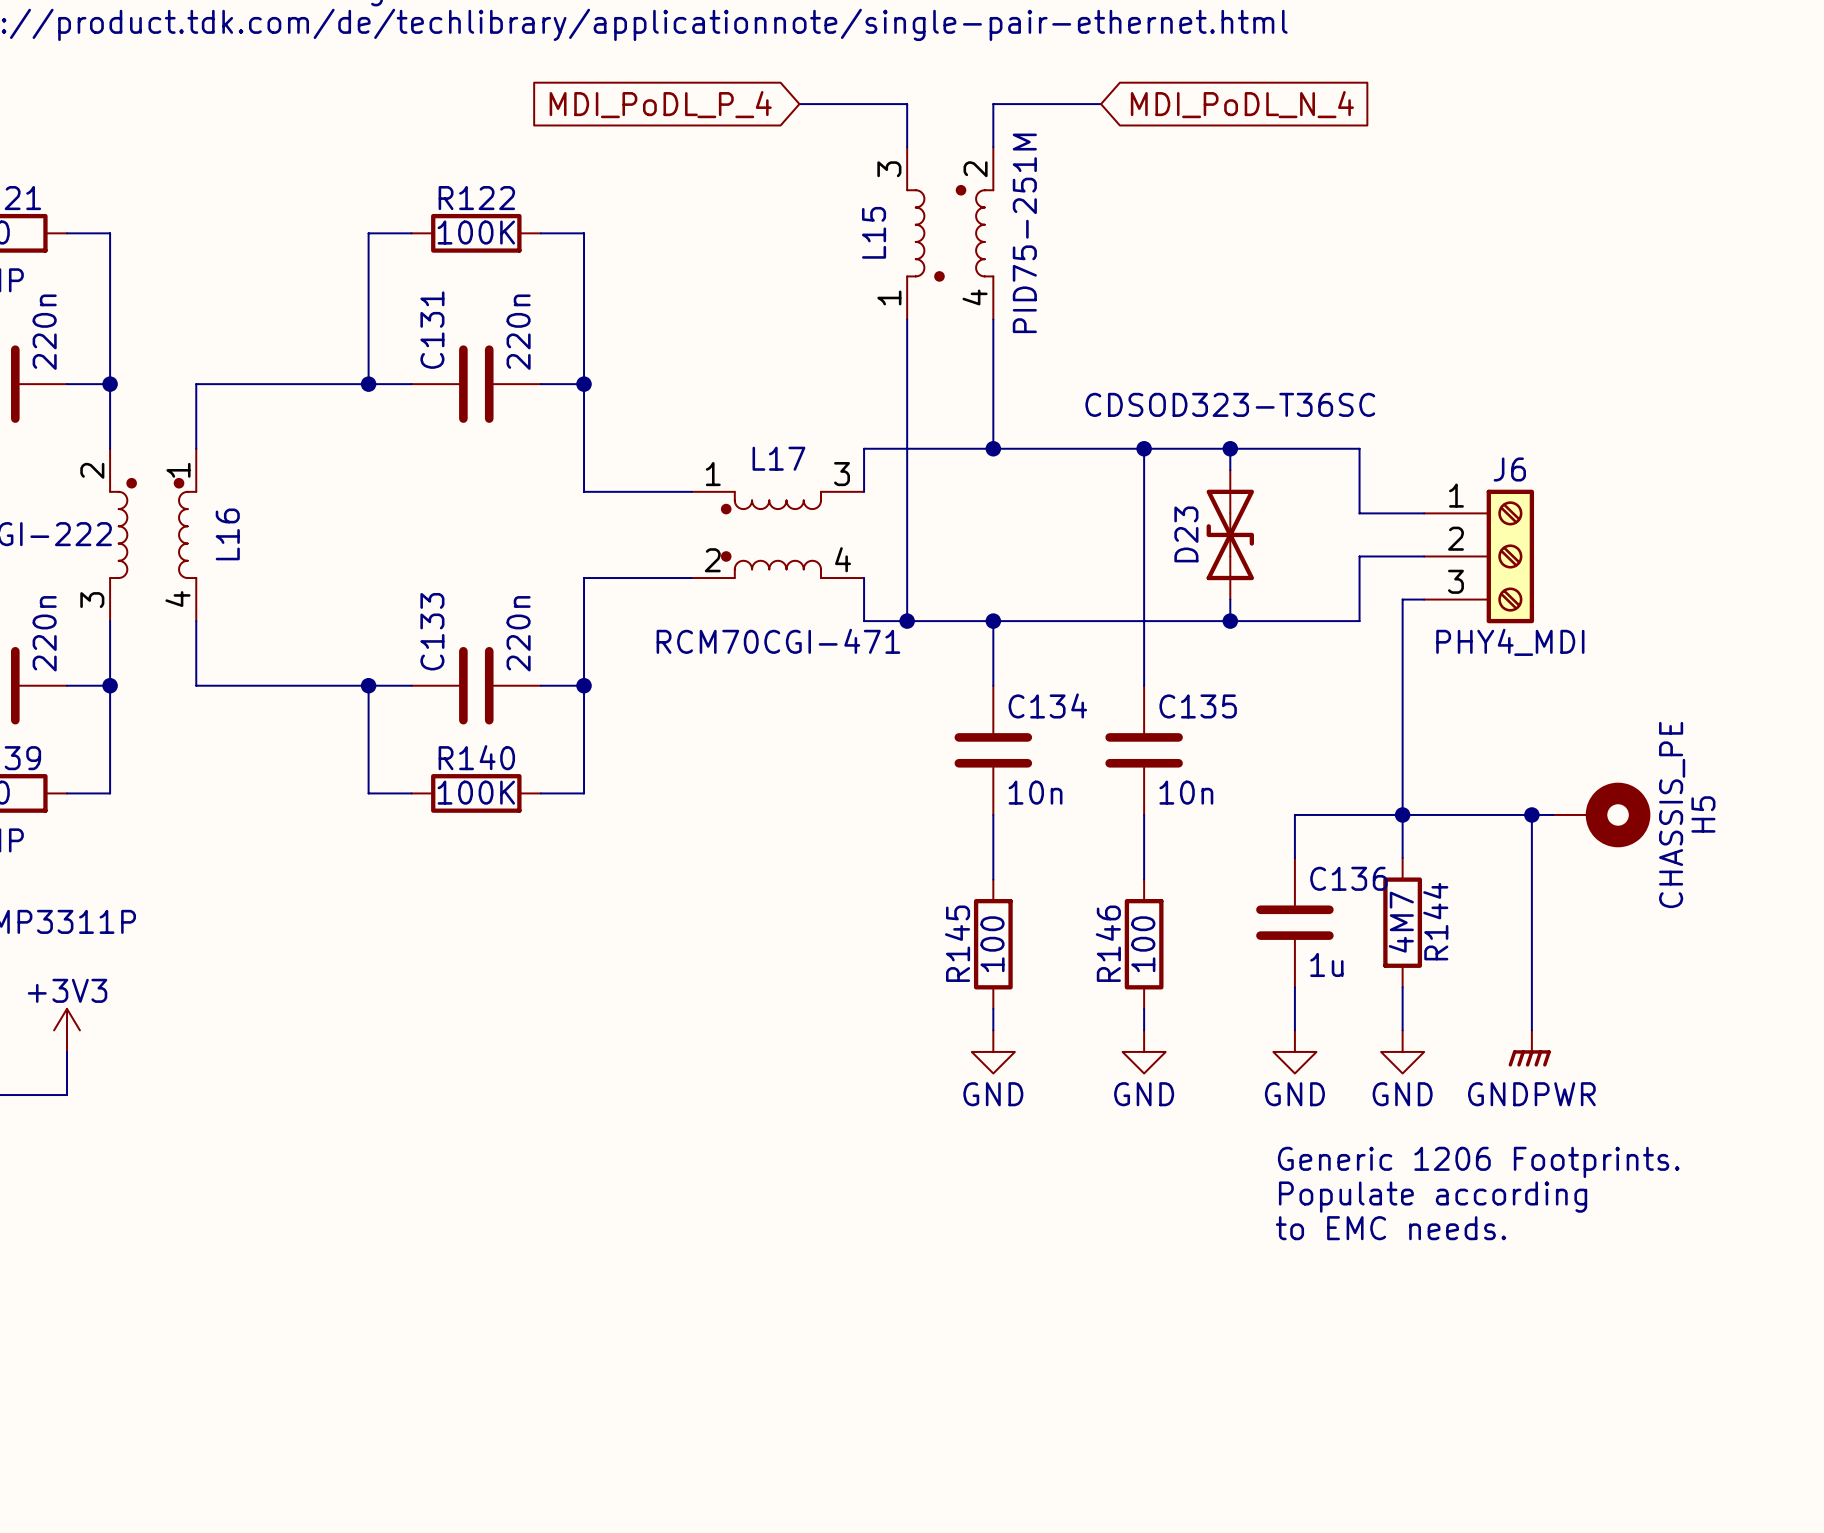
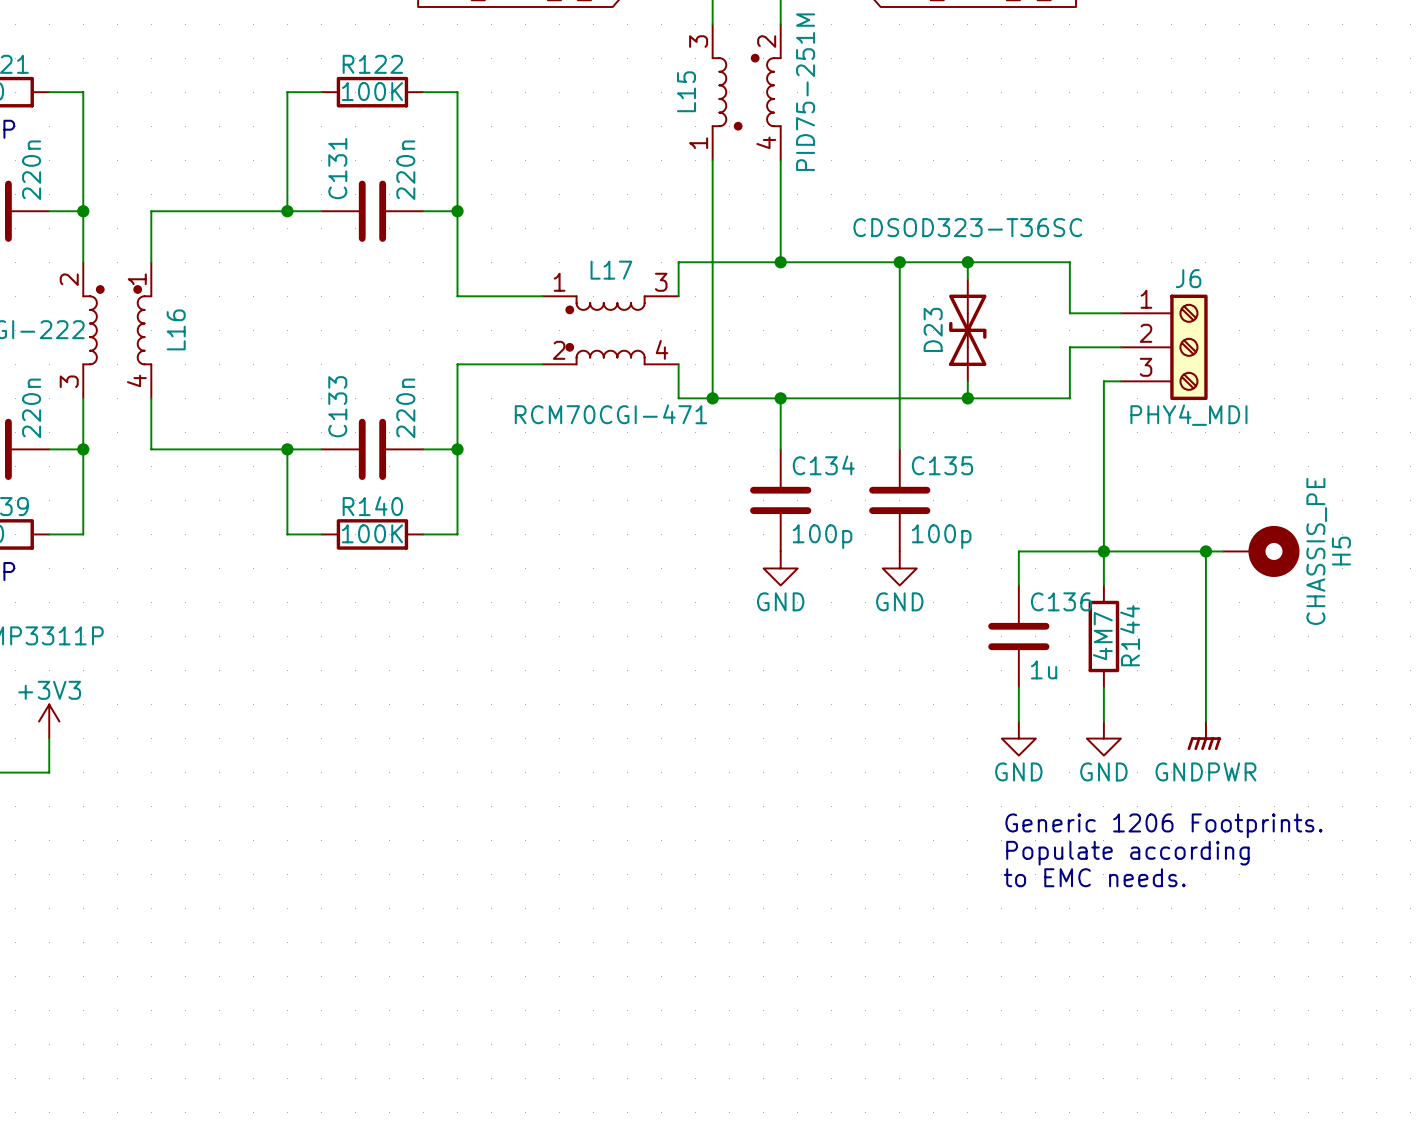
C134 value: 10n (1035, 792) -> 100p (822, 536)
C135 value: 10n (1186, 792) -> 100p (941, 536)
wire: (993, 814) (993, 879) -> none
wire: (1144, 814) (1144, 879) -> none
power symbol: none -> GND (780, 568)
power symbol: none -> GND (899, 568)
R145: 100 (993, 944) -> none
R146: 100 (1144, 944) -> none
wire: (993, 1008) (993, 1030) -> none
wire: (1144, 1008) (1144, 1030) -> none
power symbol: GND (993, 1051) -> none
power symbol: GND (1144, 1051) -> none

